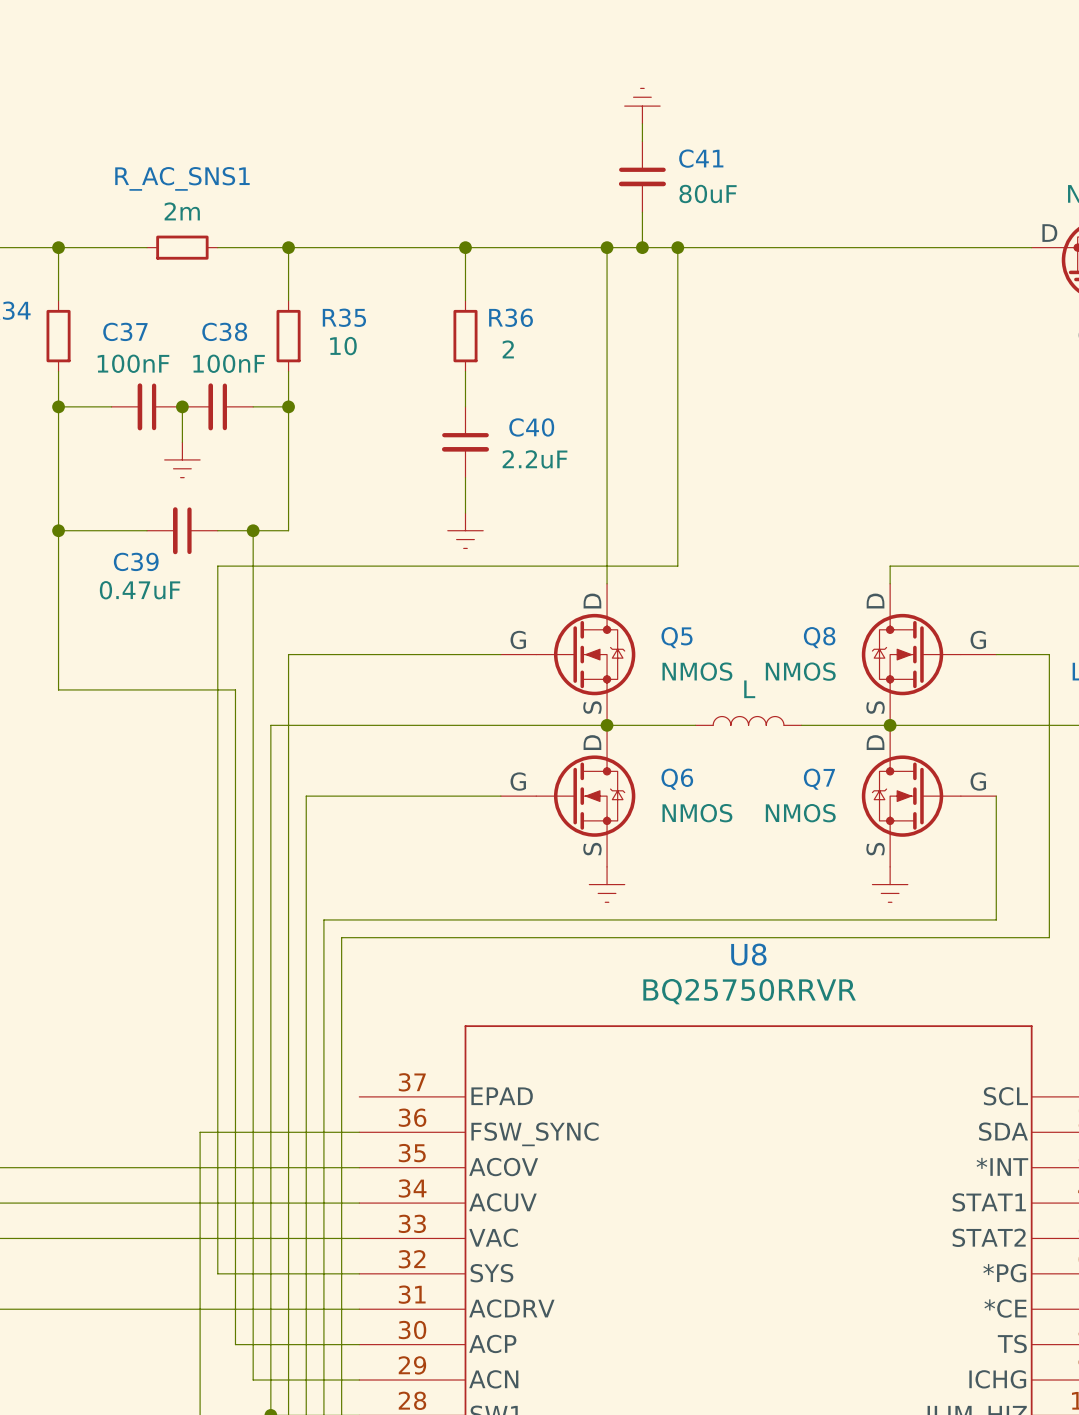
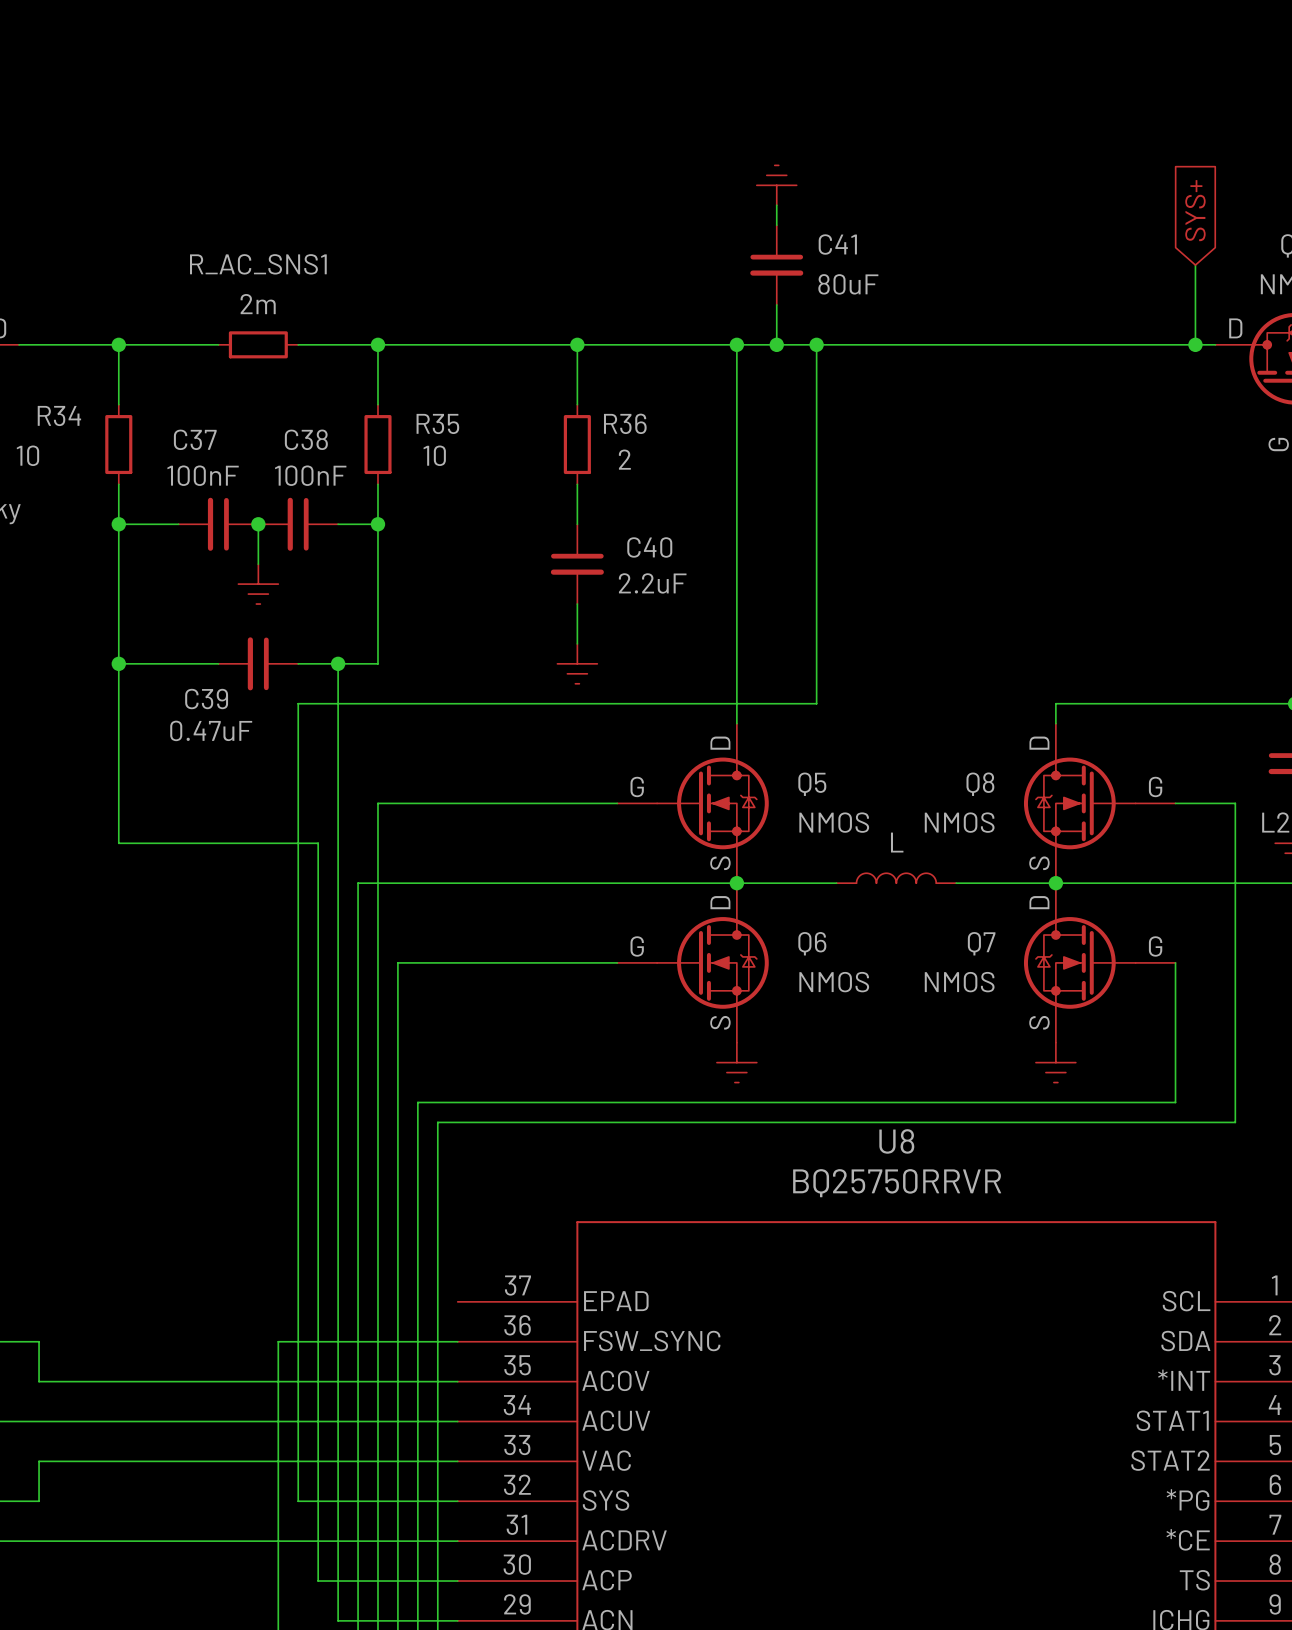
global label: none -> SYS+ (1195, 210)
wire: none -> (1195, 265) (1195, 344)
junction: none -> (1195, 344)

